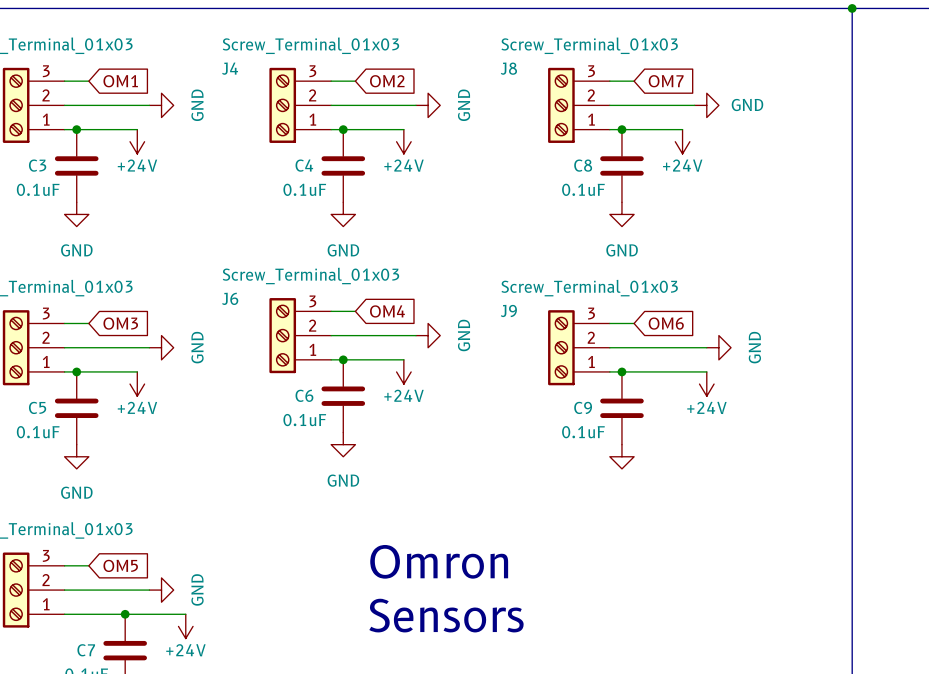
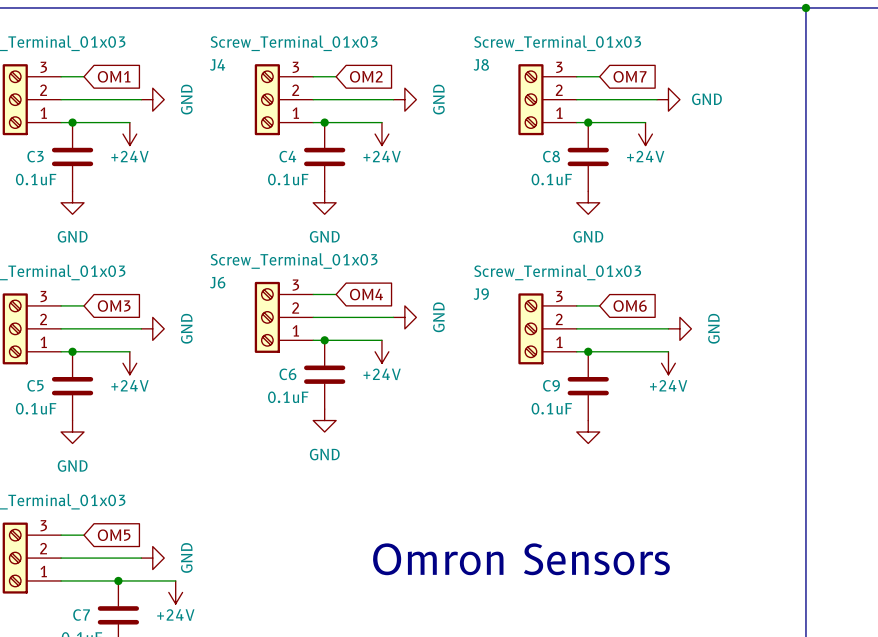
text: Omron (439, 561) -> none
text: Sensors (446, 615) -> Omron Sensors (521, 559)

